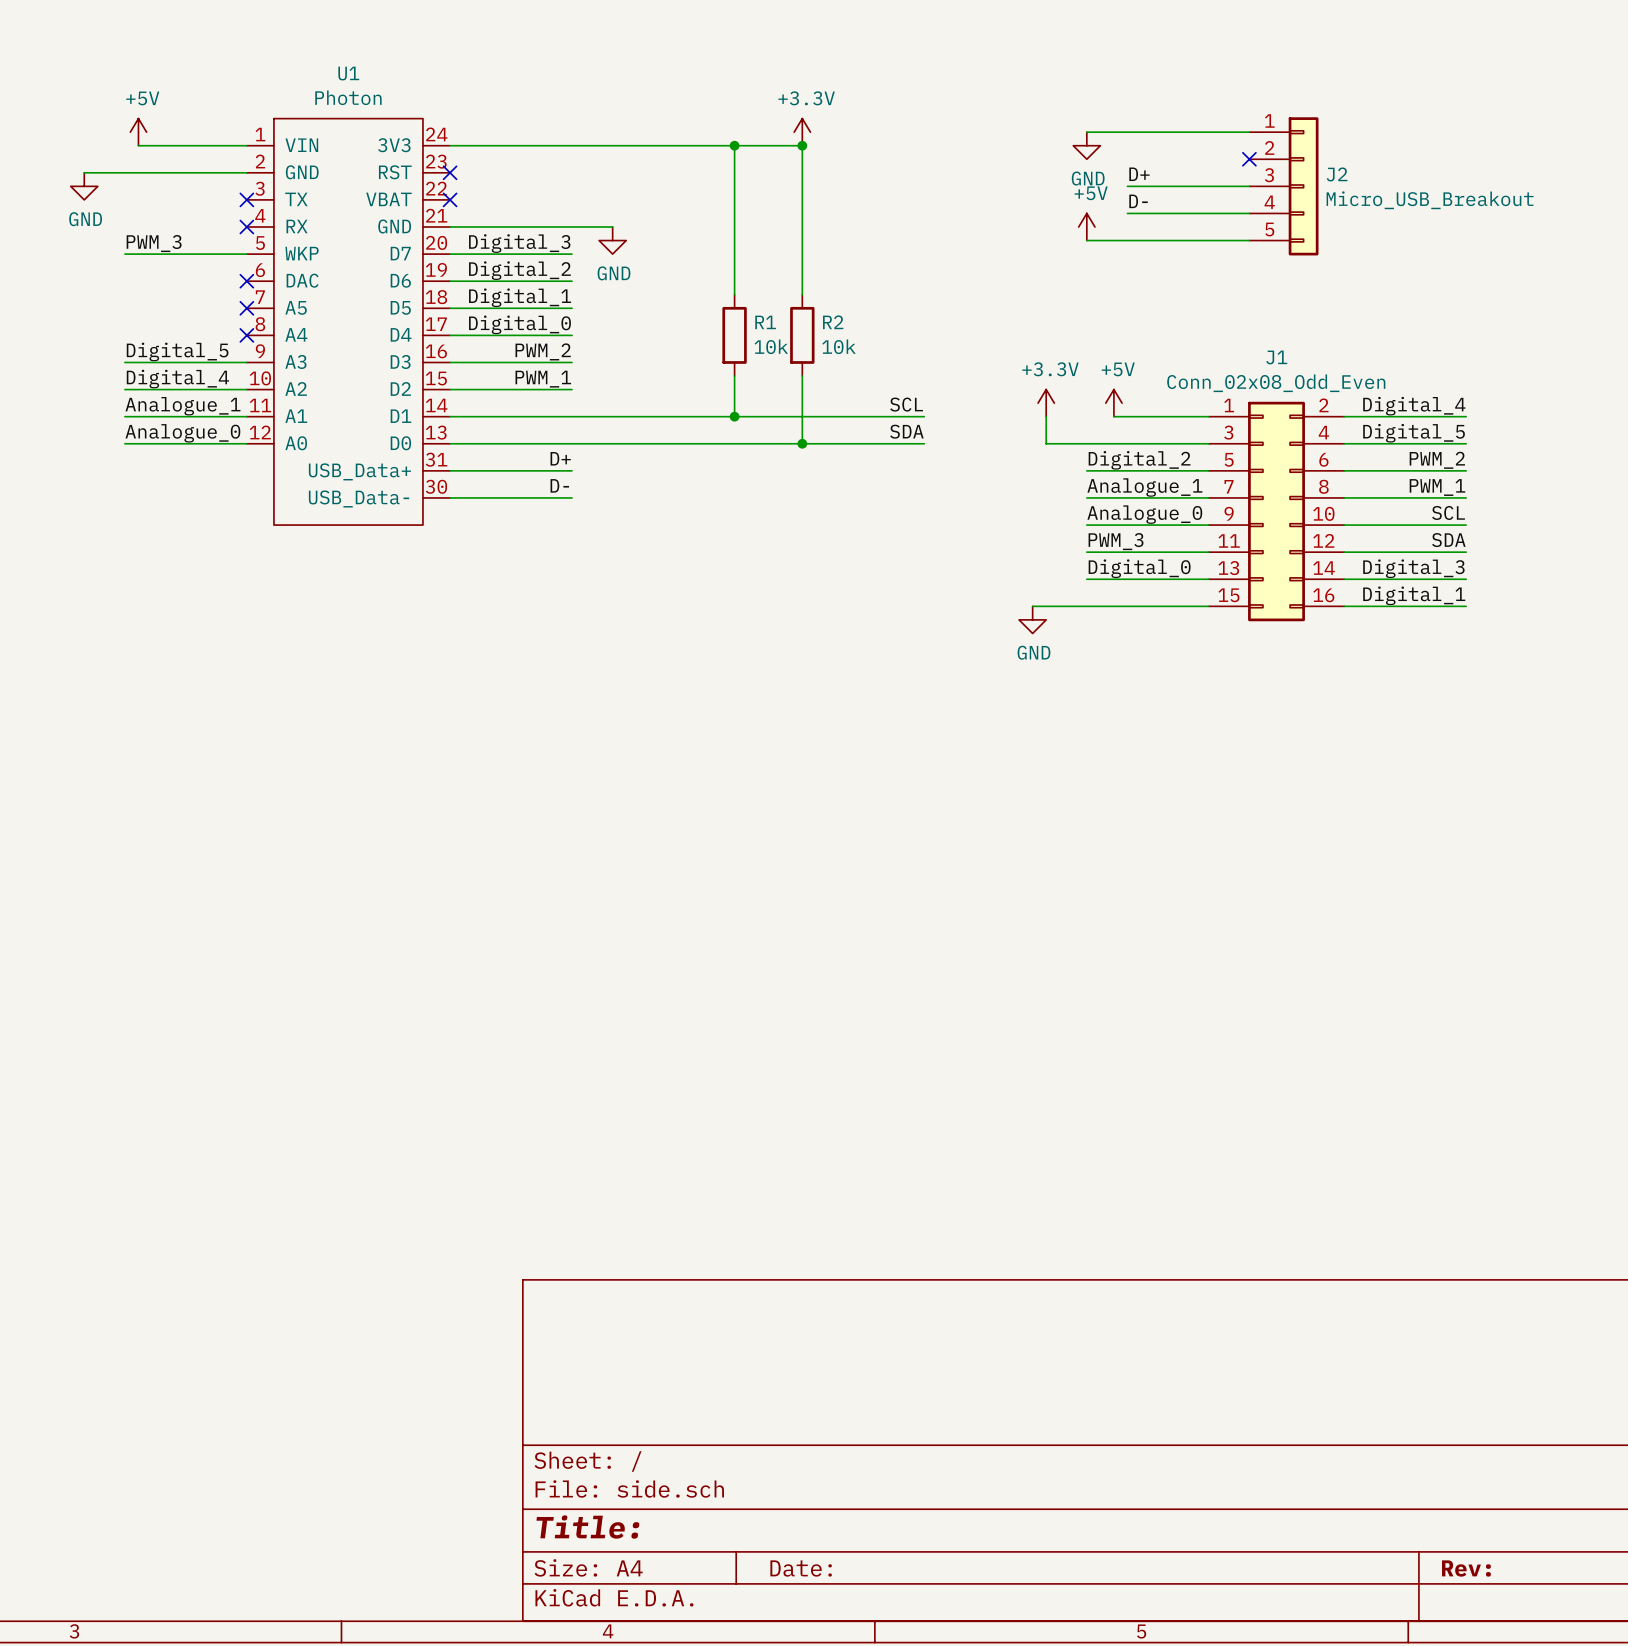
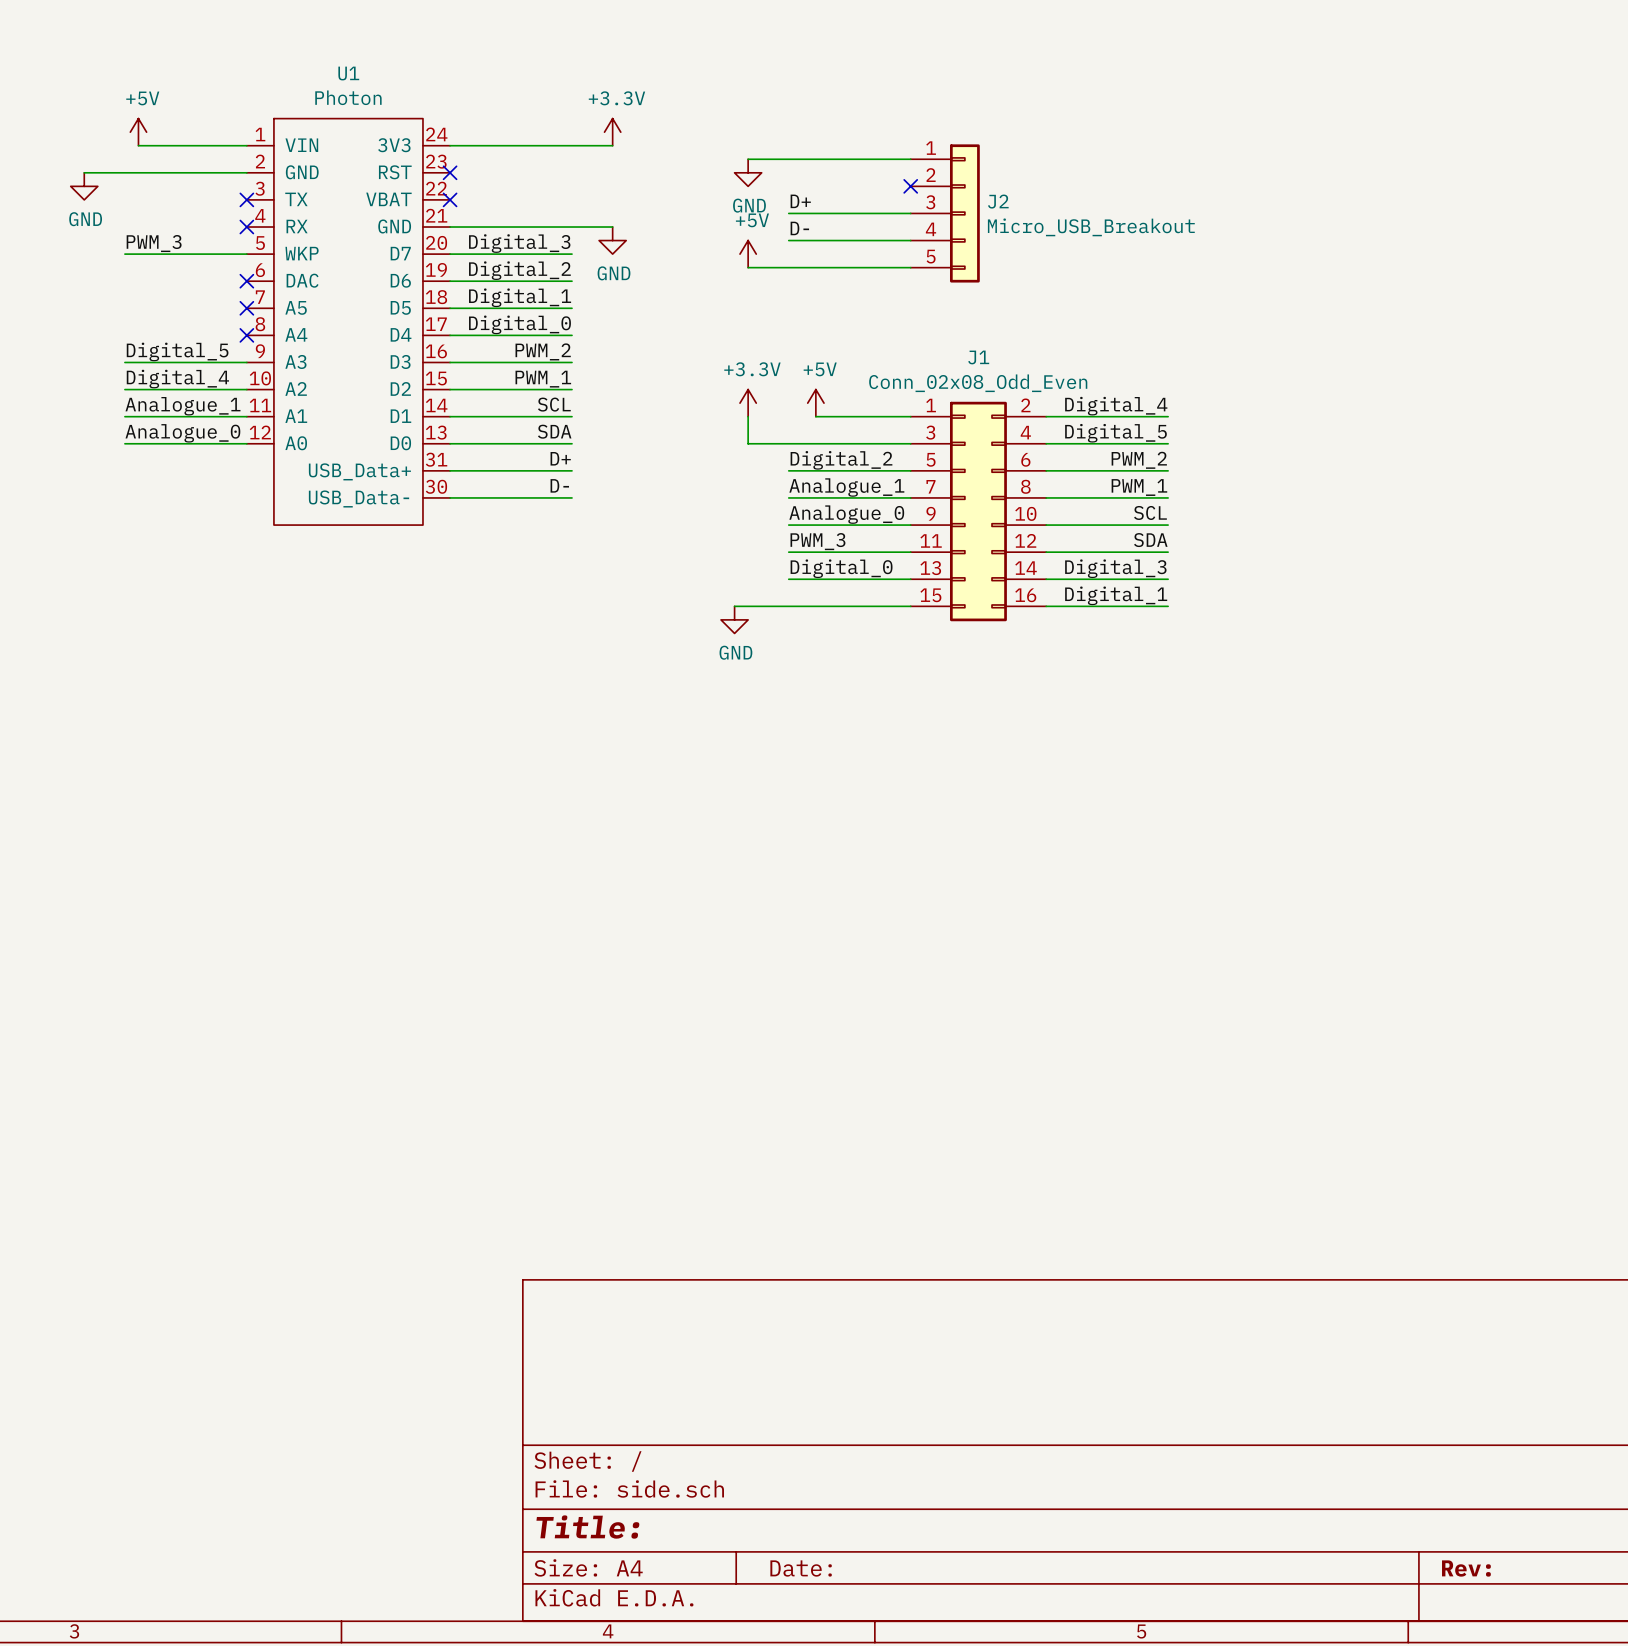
power symbol: none -> +3.3V (612, 132)
power symbol: +3.3V (802, 132) -> none
wire: (1086, 132) (1249, 132) -> none
wire: (612, 145) (802, 145) (802, 294) -> none
wire: (734, 145) (734, 294) -> none
junction: (734, 145) -> none
junction: (802, 145) -> none
power symbol: GND (1086, 145) -> none
wire: none -> (748, 159) (910, 159)
no-connect mark: (1249, 159) -> none
power symbol: none -> GND (748, 172)
label: D+ (1139, 174) -> none
no-connect mark: none -> (910, 186)
wire: (1127, 186) (1249, 186) -> none
J2 position: (1283, 186) -> (945, 213)
label: none -> D+ (800, 201)
label: D- (1138, 201) -> none
wire: none -> (788, 213) (910, 213)
wire: (1127, 213) (1249, 213) -> none
power symbol: +5V (1086, 227) -> none
label: none -> D- (799, 228)
wire: none -> (788, 240) (910, 240)
wire: (1086, 240) (1249, 240) -> none
power symbol: none -> +5V (748, 254)
wire: none -> (748, 267) (910, 267)
R1: 10k (734, 335) -> none
R2: 10k (802, 335) -> none
wire: (734, 376) (734, 416) -> none
wire: (802, 376) (802, 443) -> none
power symbol: none -> +3.3V (748, 403)
power symbol: none -> +5V (815, 403)
power symbol: +3.3V (1046, 403) -> none
power symbol: +5V (1113, 403) -> none
label: none -> SCL (554, 404)
label: SCL (906, 404) -> none
label: none -> Digital_4 (1116, 406)
label: Digital_4 (1414, 406) -> none
wire: (572, 416) (815, 416) -> none
junction: (734, 416) -> none
wire: (1046, 416) (1046, 443) -> (1046, 416) (1113, 416)
wire: (1168, 416) (1208, 416) -> none
wire: (1344, 416) (1466, 416) -> none
label: none -> SDA (554, 431)
label: SDA (906, 431) -> none
label: Digital_5 (1414, 433) -> none
wire: (572, 443) (748, 443) -> (748, 416) (748, 443)
junction: (802, 443) -> none
wire: (1168, 443) (1208, 443) -> none
wire: (1344, 443) (1466, 443) -> none
label: none -> Digital_2 (841, 460)
label: Digital_2 (1139, 460) -> Digital_5 (1115, 433)
label: none -> PWM_2 (1139, 460)
label: PWM_2 (1437, 460) -> none
wire: none -> (788, 470) (910, 470)
wire: (1168, 470) (1208, 470) -> (1046, 470) (1086, 470)
wire: (1344, 470) (1466, 470) -> none
label: none -> Analogue_1 (846, 487)
label: none -> PWM_1 (1139, 487)
label: Analogue_1 (1144, 487) -> none
label: PWM_1 (1437, 487) -> none
wire: none -> (788, 497) (910, 497)
wire: (1168, 497) (1208, 497) -> (1046, 497) (1086, 497)
wire: (1344, 497) (1466, 497) -> none
J1 position: (1276, 511) -> (978, 511)
label: none -> SCL (1150, 512)
label: SCL (1448, 512) -> none
label: none -> Analogue_0 (846, 514)
label: Analogue_0 (1144, 514) -> none
wire: none -> (788, 525) (910, 525)
wire: (1168, 525) (1208, 525) -> (1046, 525) (1086, 525)
wire: (1344, 525) (1466, 525) -> none
label: none -> SDA (1150, 540)
label: SDA (1448, 540) -> none
label: none -> PWM_3 (817, 541)
label: PWM_3 (1116, 541) -> none
wire: none -> (788, 552) (910, 552)
wire: (1168, 552) (1208, 552) -> (1046, 552) (1086, 552)
wire: (1344, 552) (1466, 552) -> none
label: none -> Digital_0 (841, 568)
label: none -> Digital_3 (1115, 568)
label: Digital_0 (1139, 568) -> none
label: Digital_3 (1413, 568) -> none
wire: none -> (788, 579) (910, 579)
wire: (1168, 579) (1208, 579) -> (1046, 579) (1086, 579)
wire: (1344, 579) (1466, 579) -> none
label: none -> Digital_1 (1116, 595)
label: Digital_1 (1414, 595) -> none
wire: none -> (734, 606) (910, 606)
wire: (1168, 606) (1208, 606) -> none
wire: (1344, 606) (1466, 606) -> none
power symbol: none -> GND (734, 619)
power symbol: GND (1032, 619) -> none

